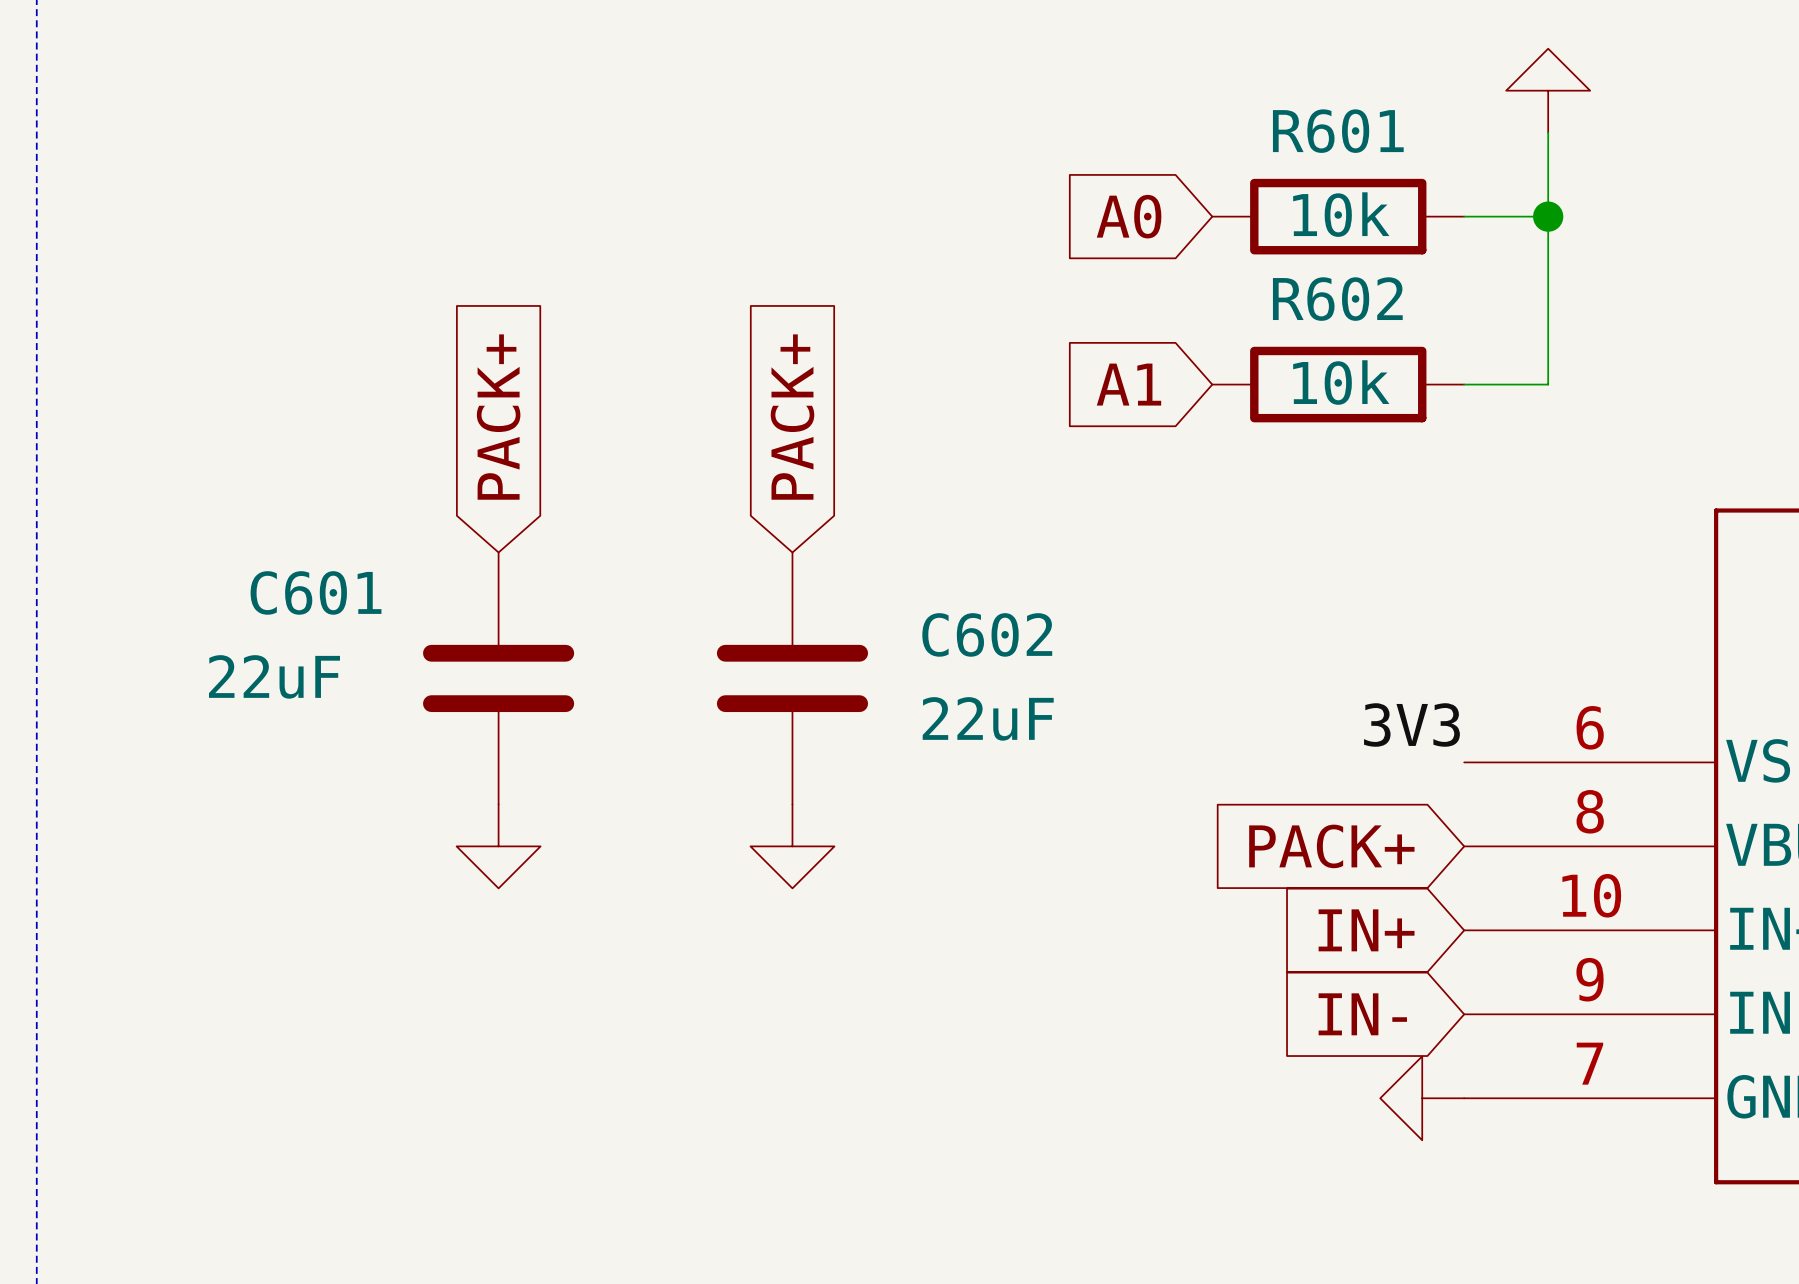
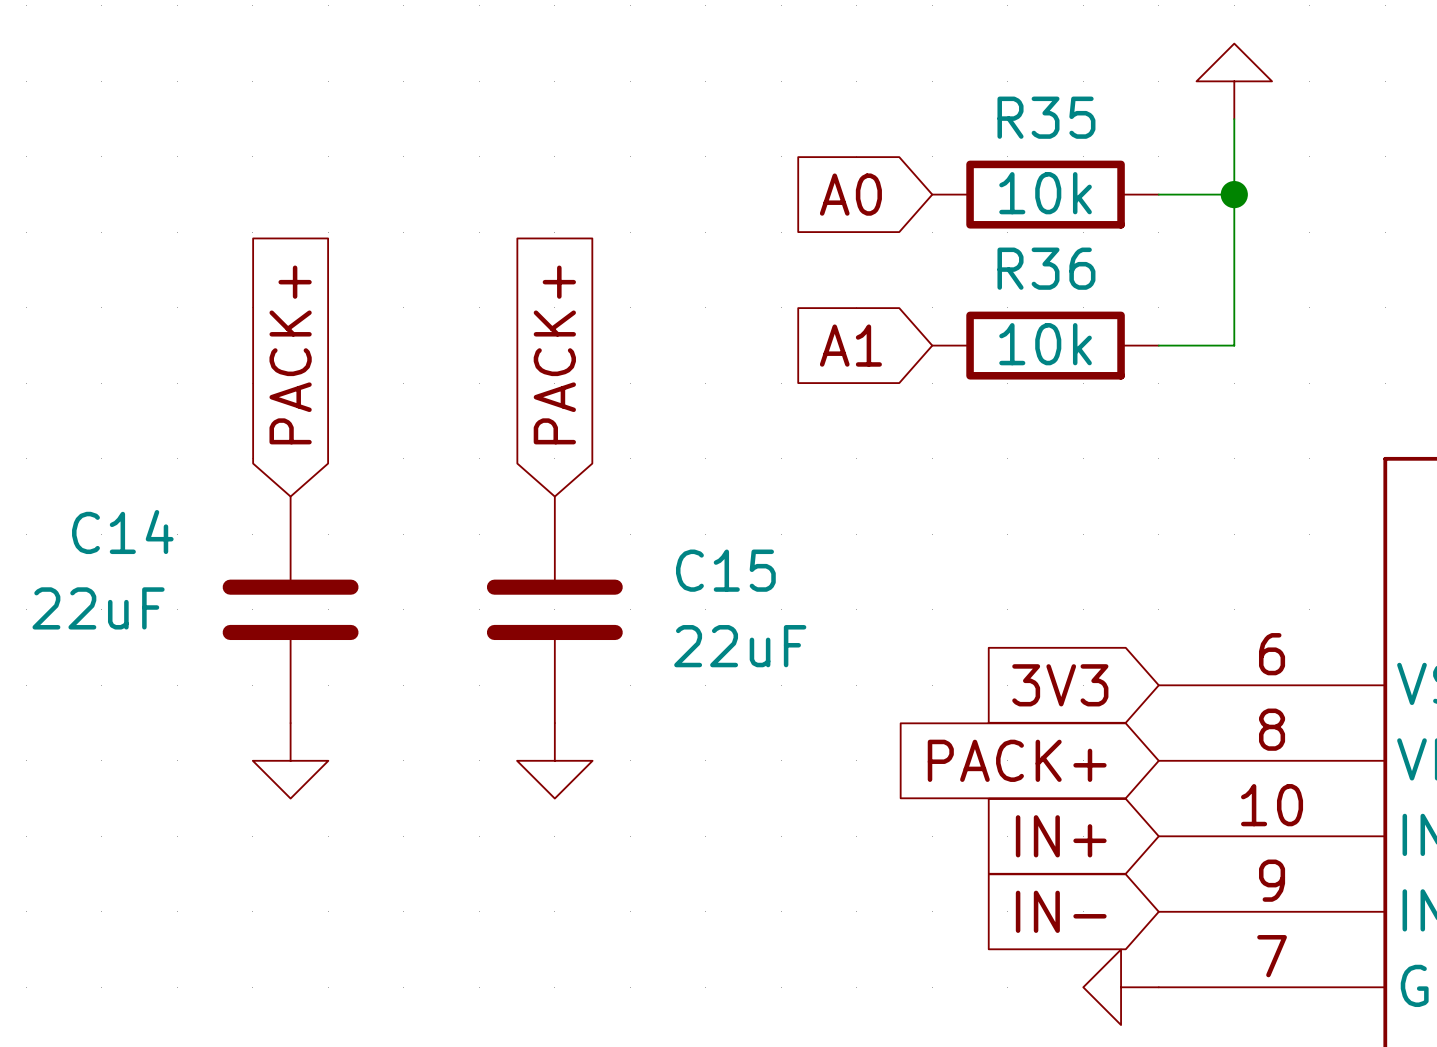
R601 name: R601 (1338, 131) -> R35 (1046, 117)
R602 name: R602 (1337, 299) -> R36 (1046, 268)
C601 name: C601 (316, 592) -> C14 (122, 532)
C602 name: C602 (987, 634) -> C15 (725, 570)
label: 3V3 (1411, 724) -> none
global label: none -> 3V3 (1060, 685)

